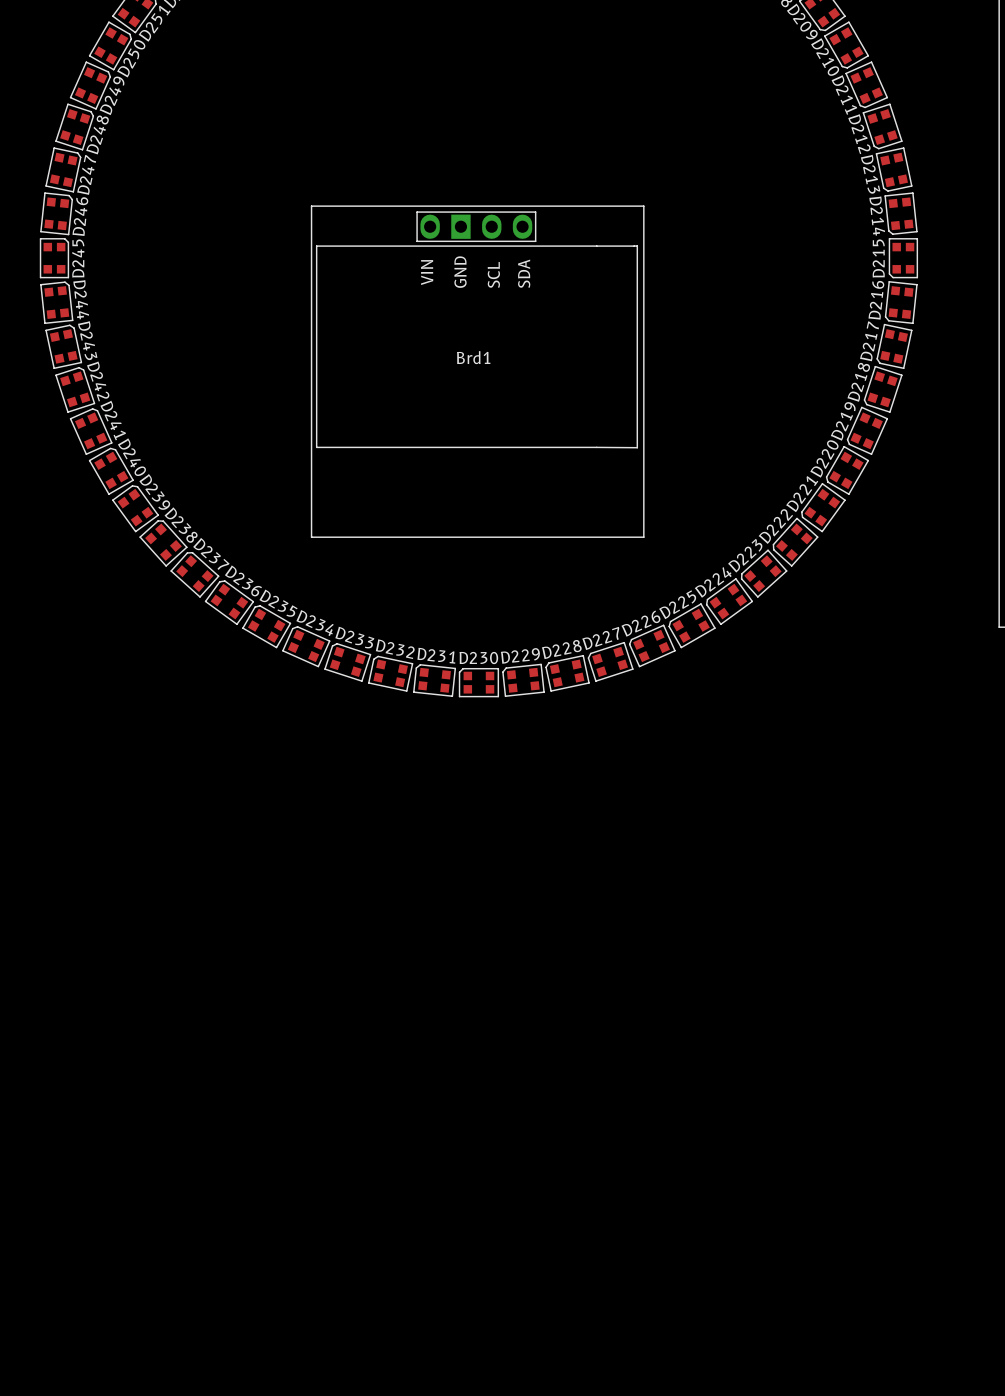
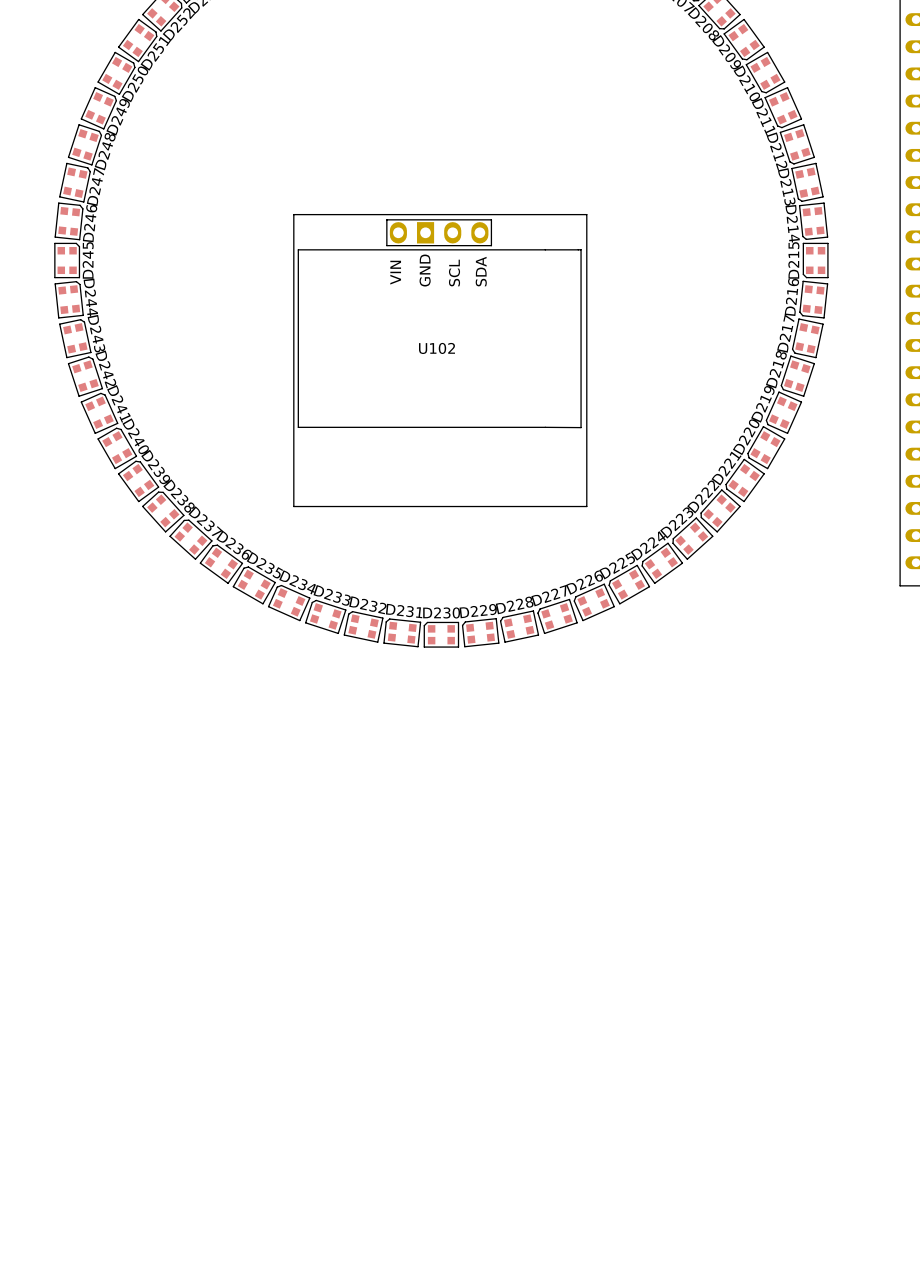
Brd1 name: Brd1 (473, 357) -> U102 (437, 348)

